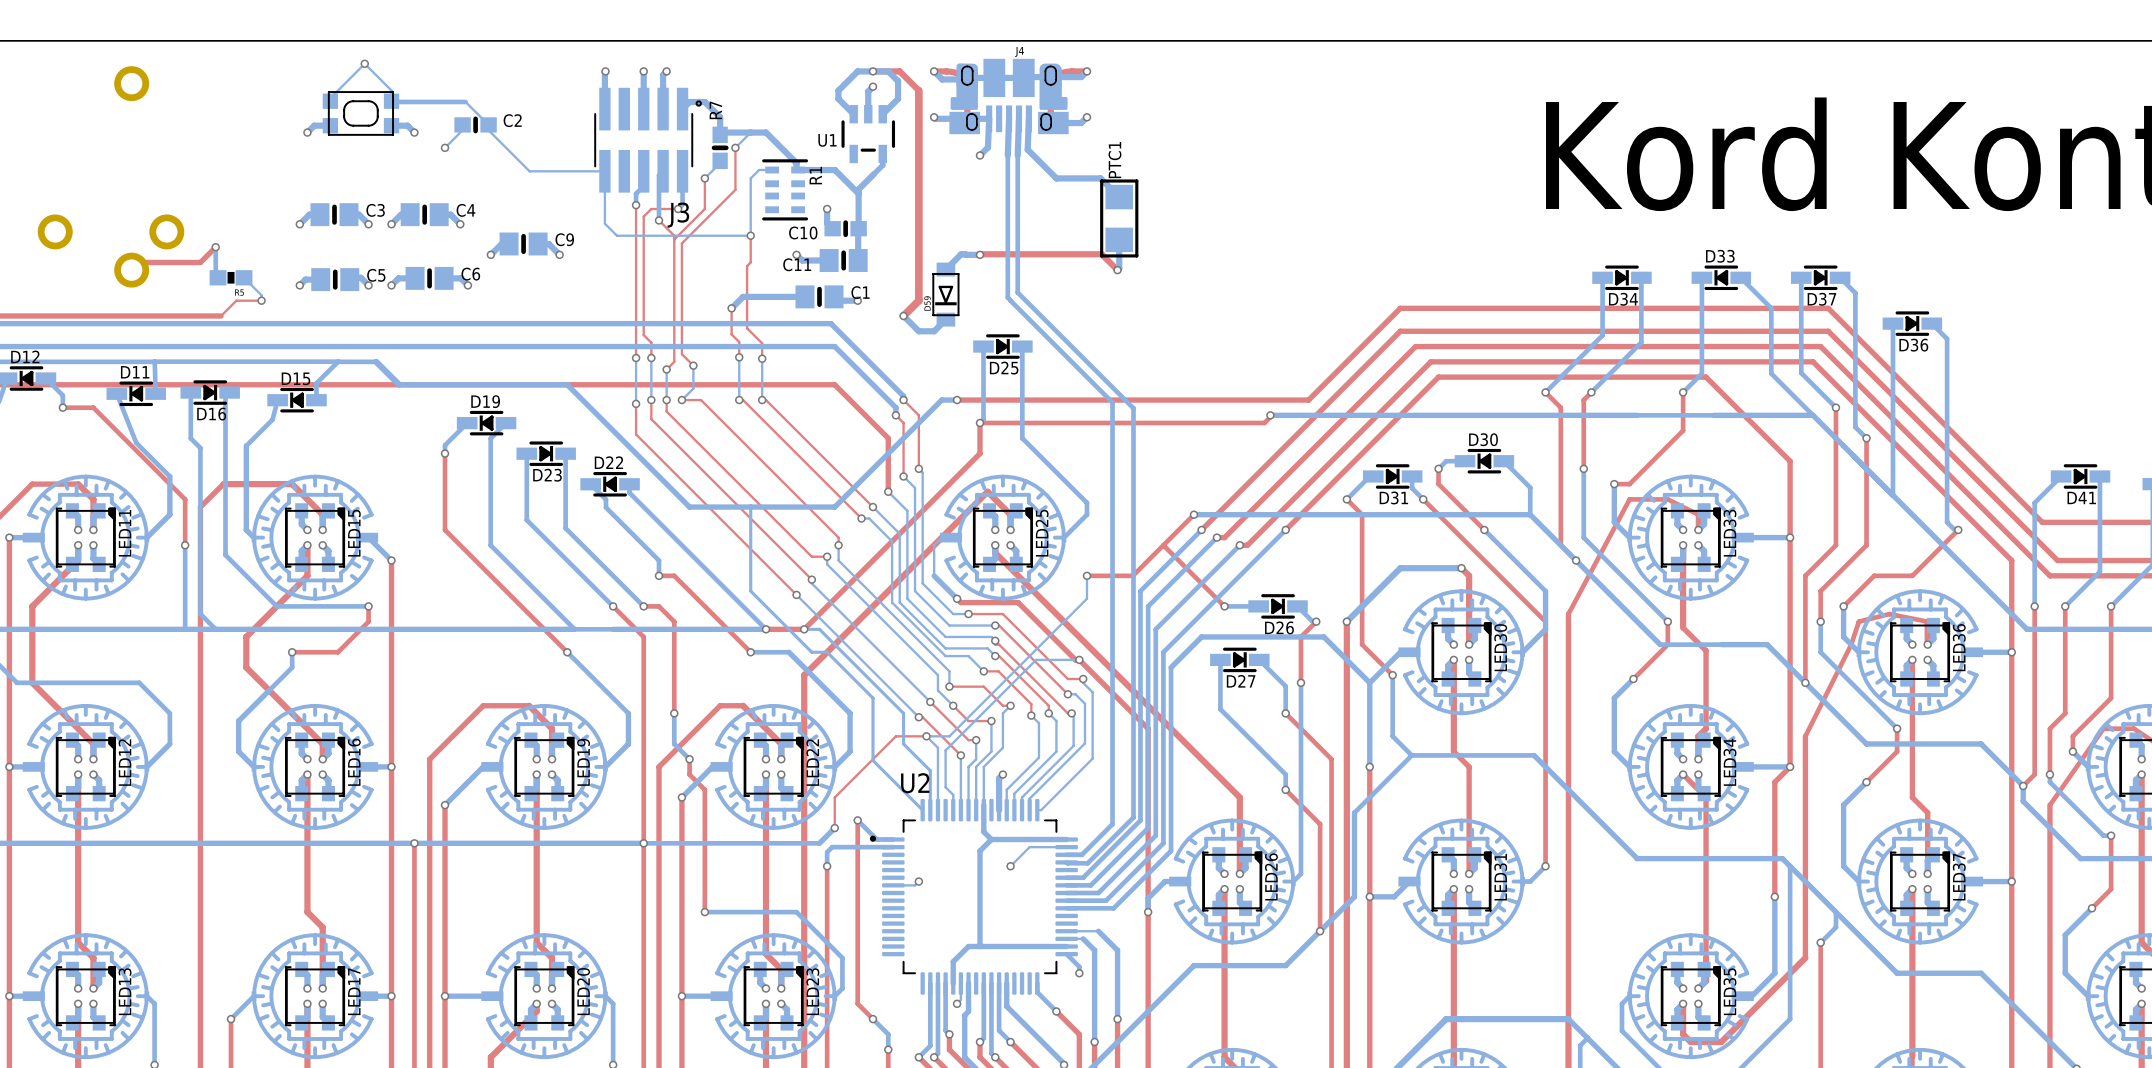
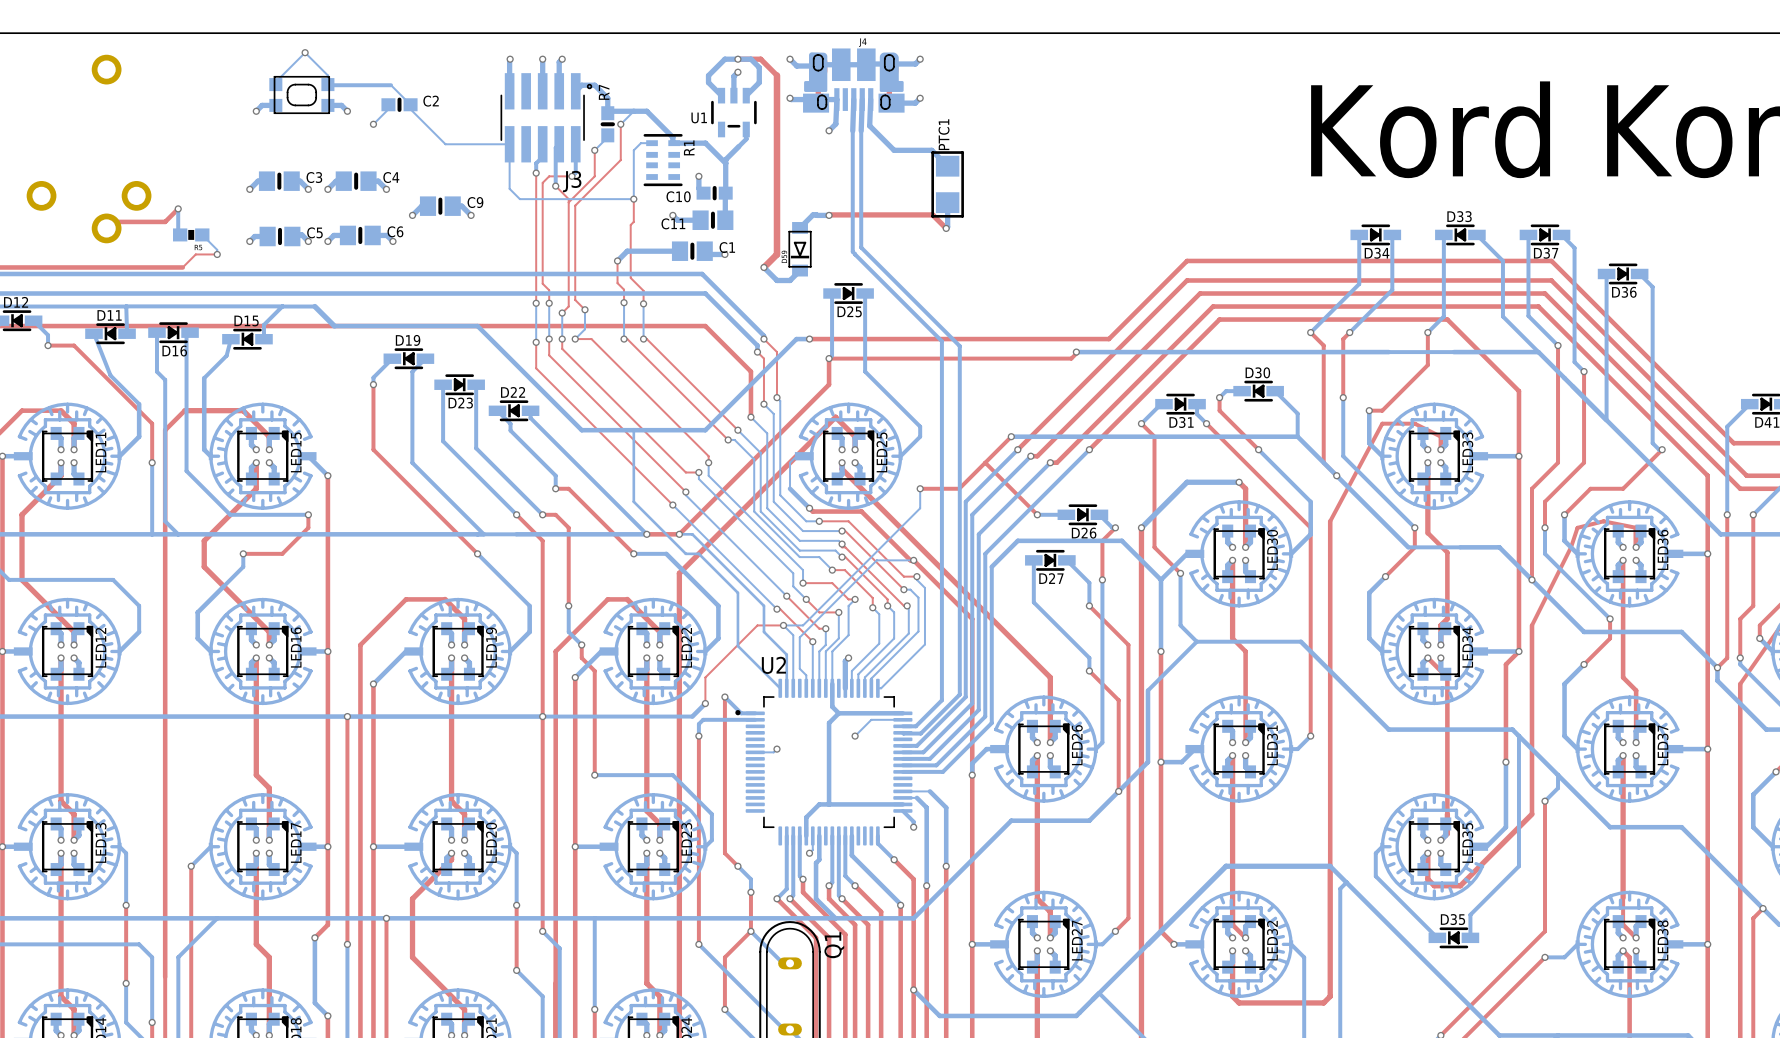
top track: (934, 71) (954, 72) (967, 80) -> none
top track: (1086, 71) (1064, 72) (1050, 80) -> none

